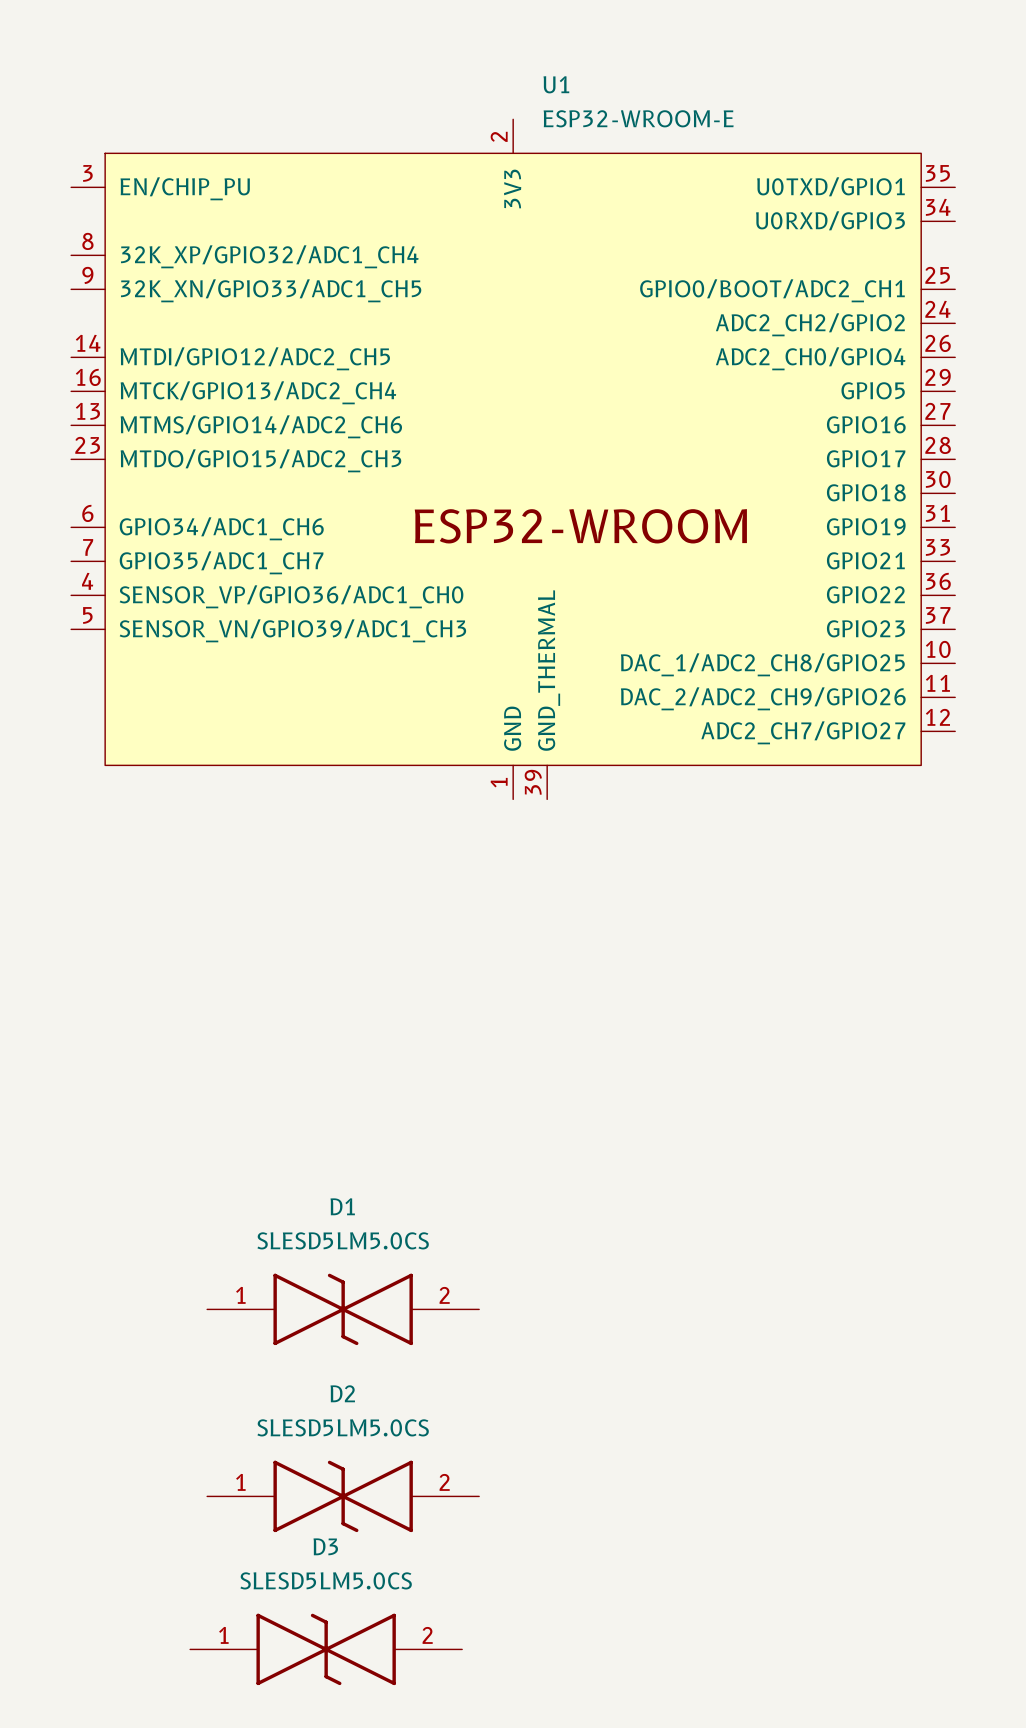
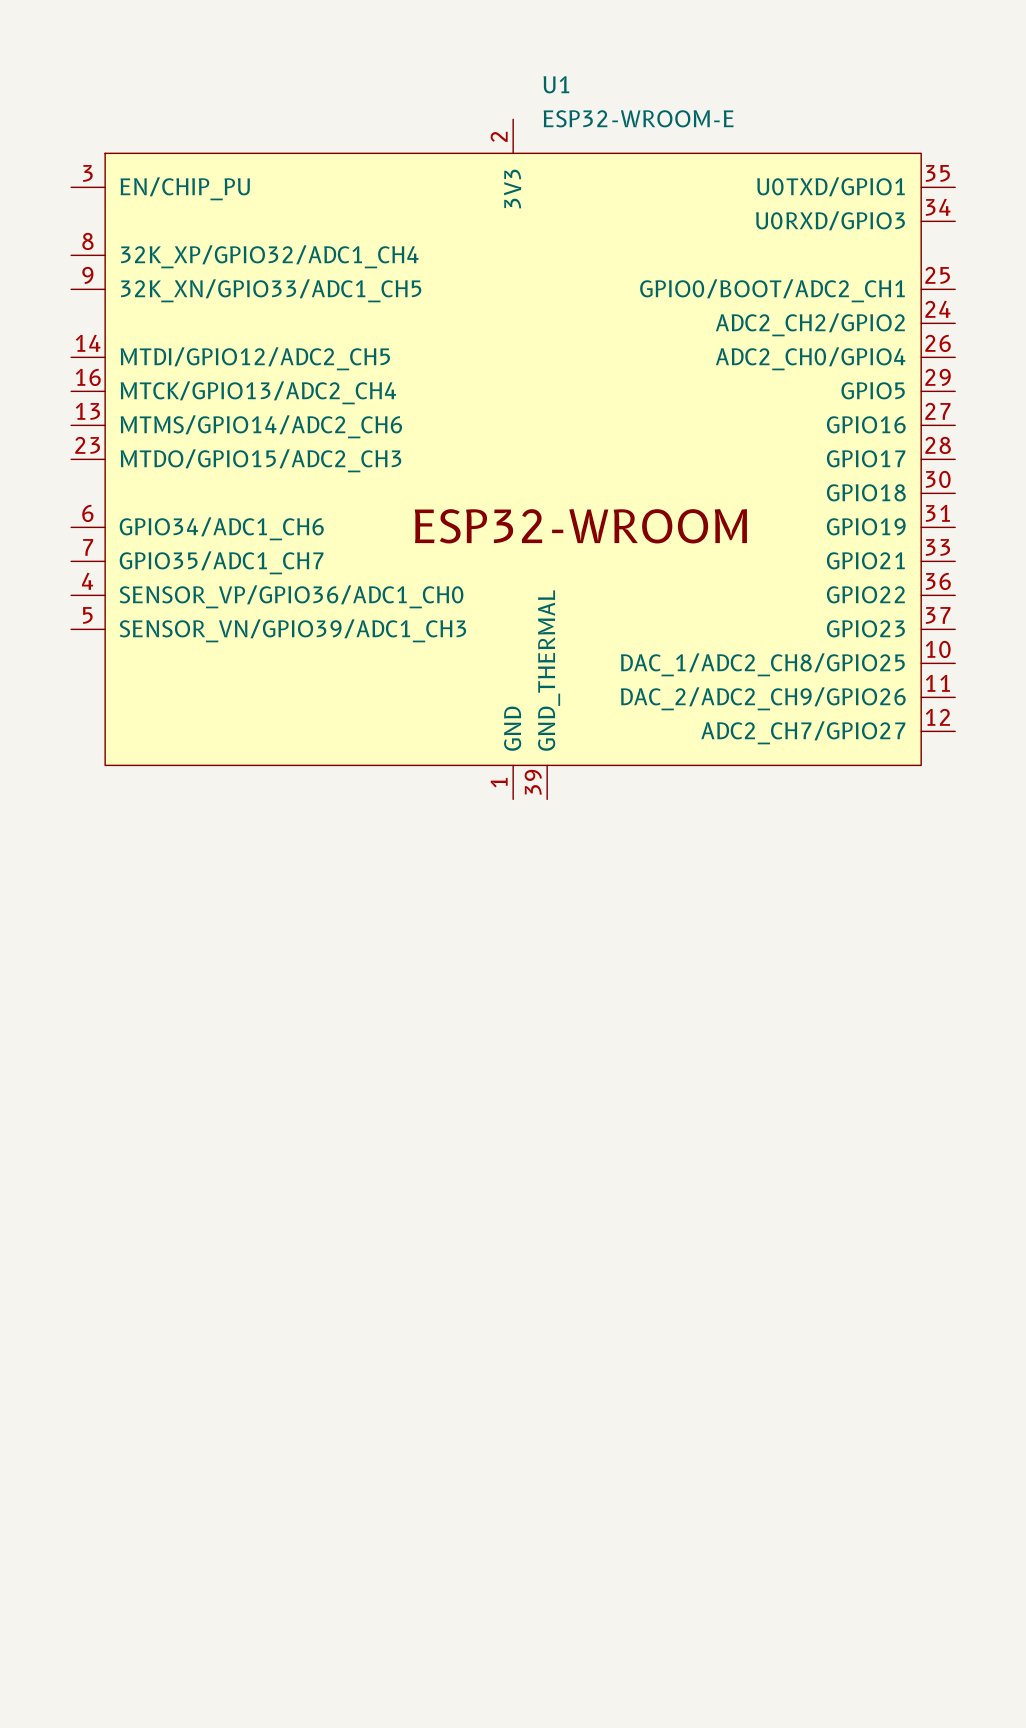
D1: SLESD5LM5.0CS (343, 1309) -> none
D2: SLESD5LM5.0CS (343, 1496) -> none
D3: SLESD5LM5.0CS (326, 1649) -> none

